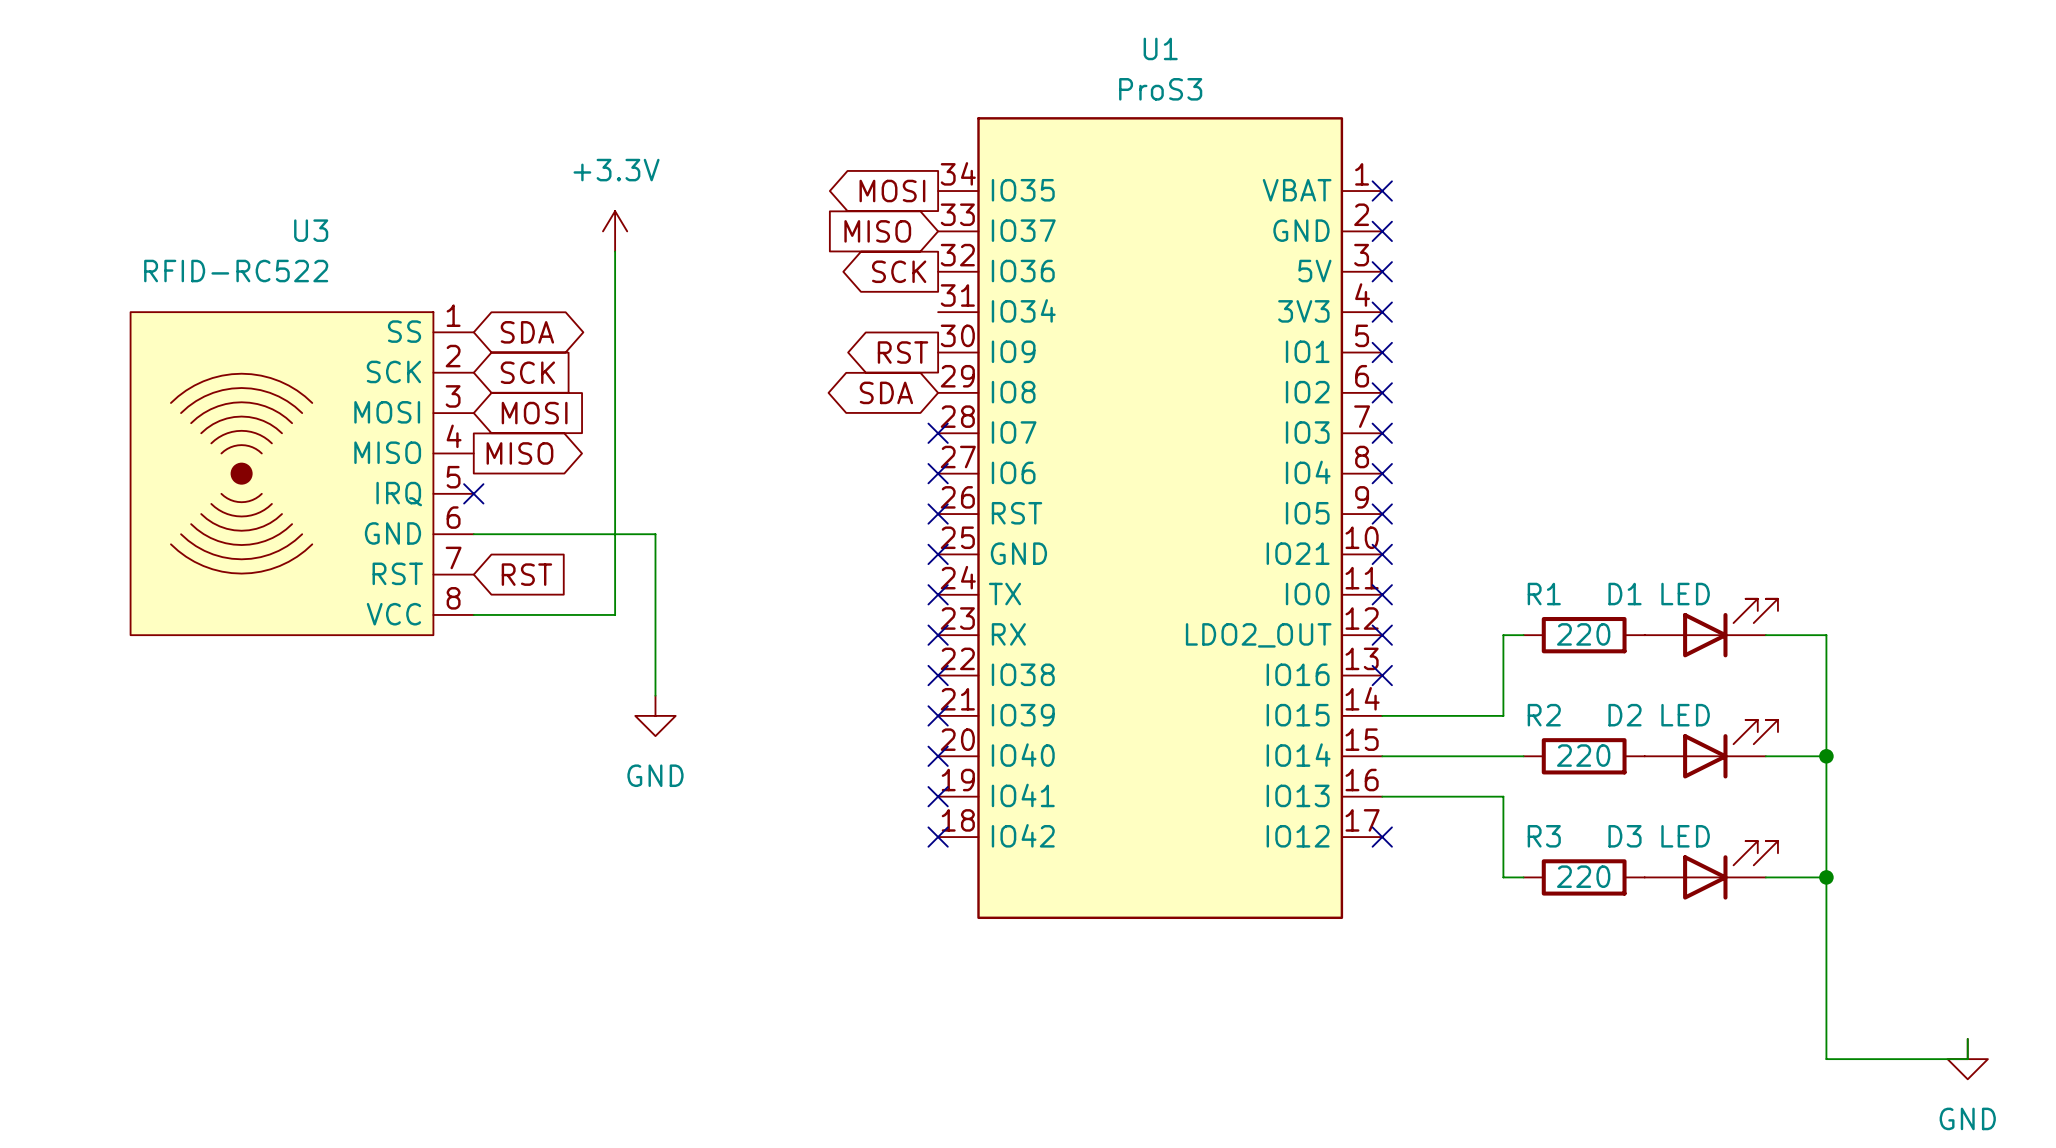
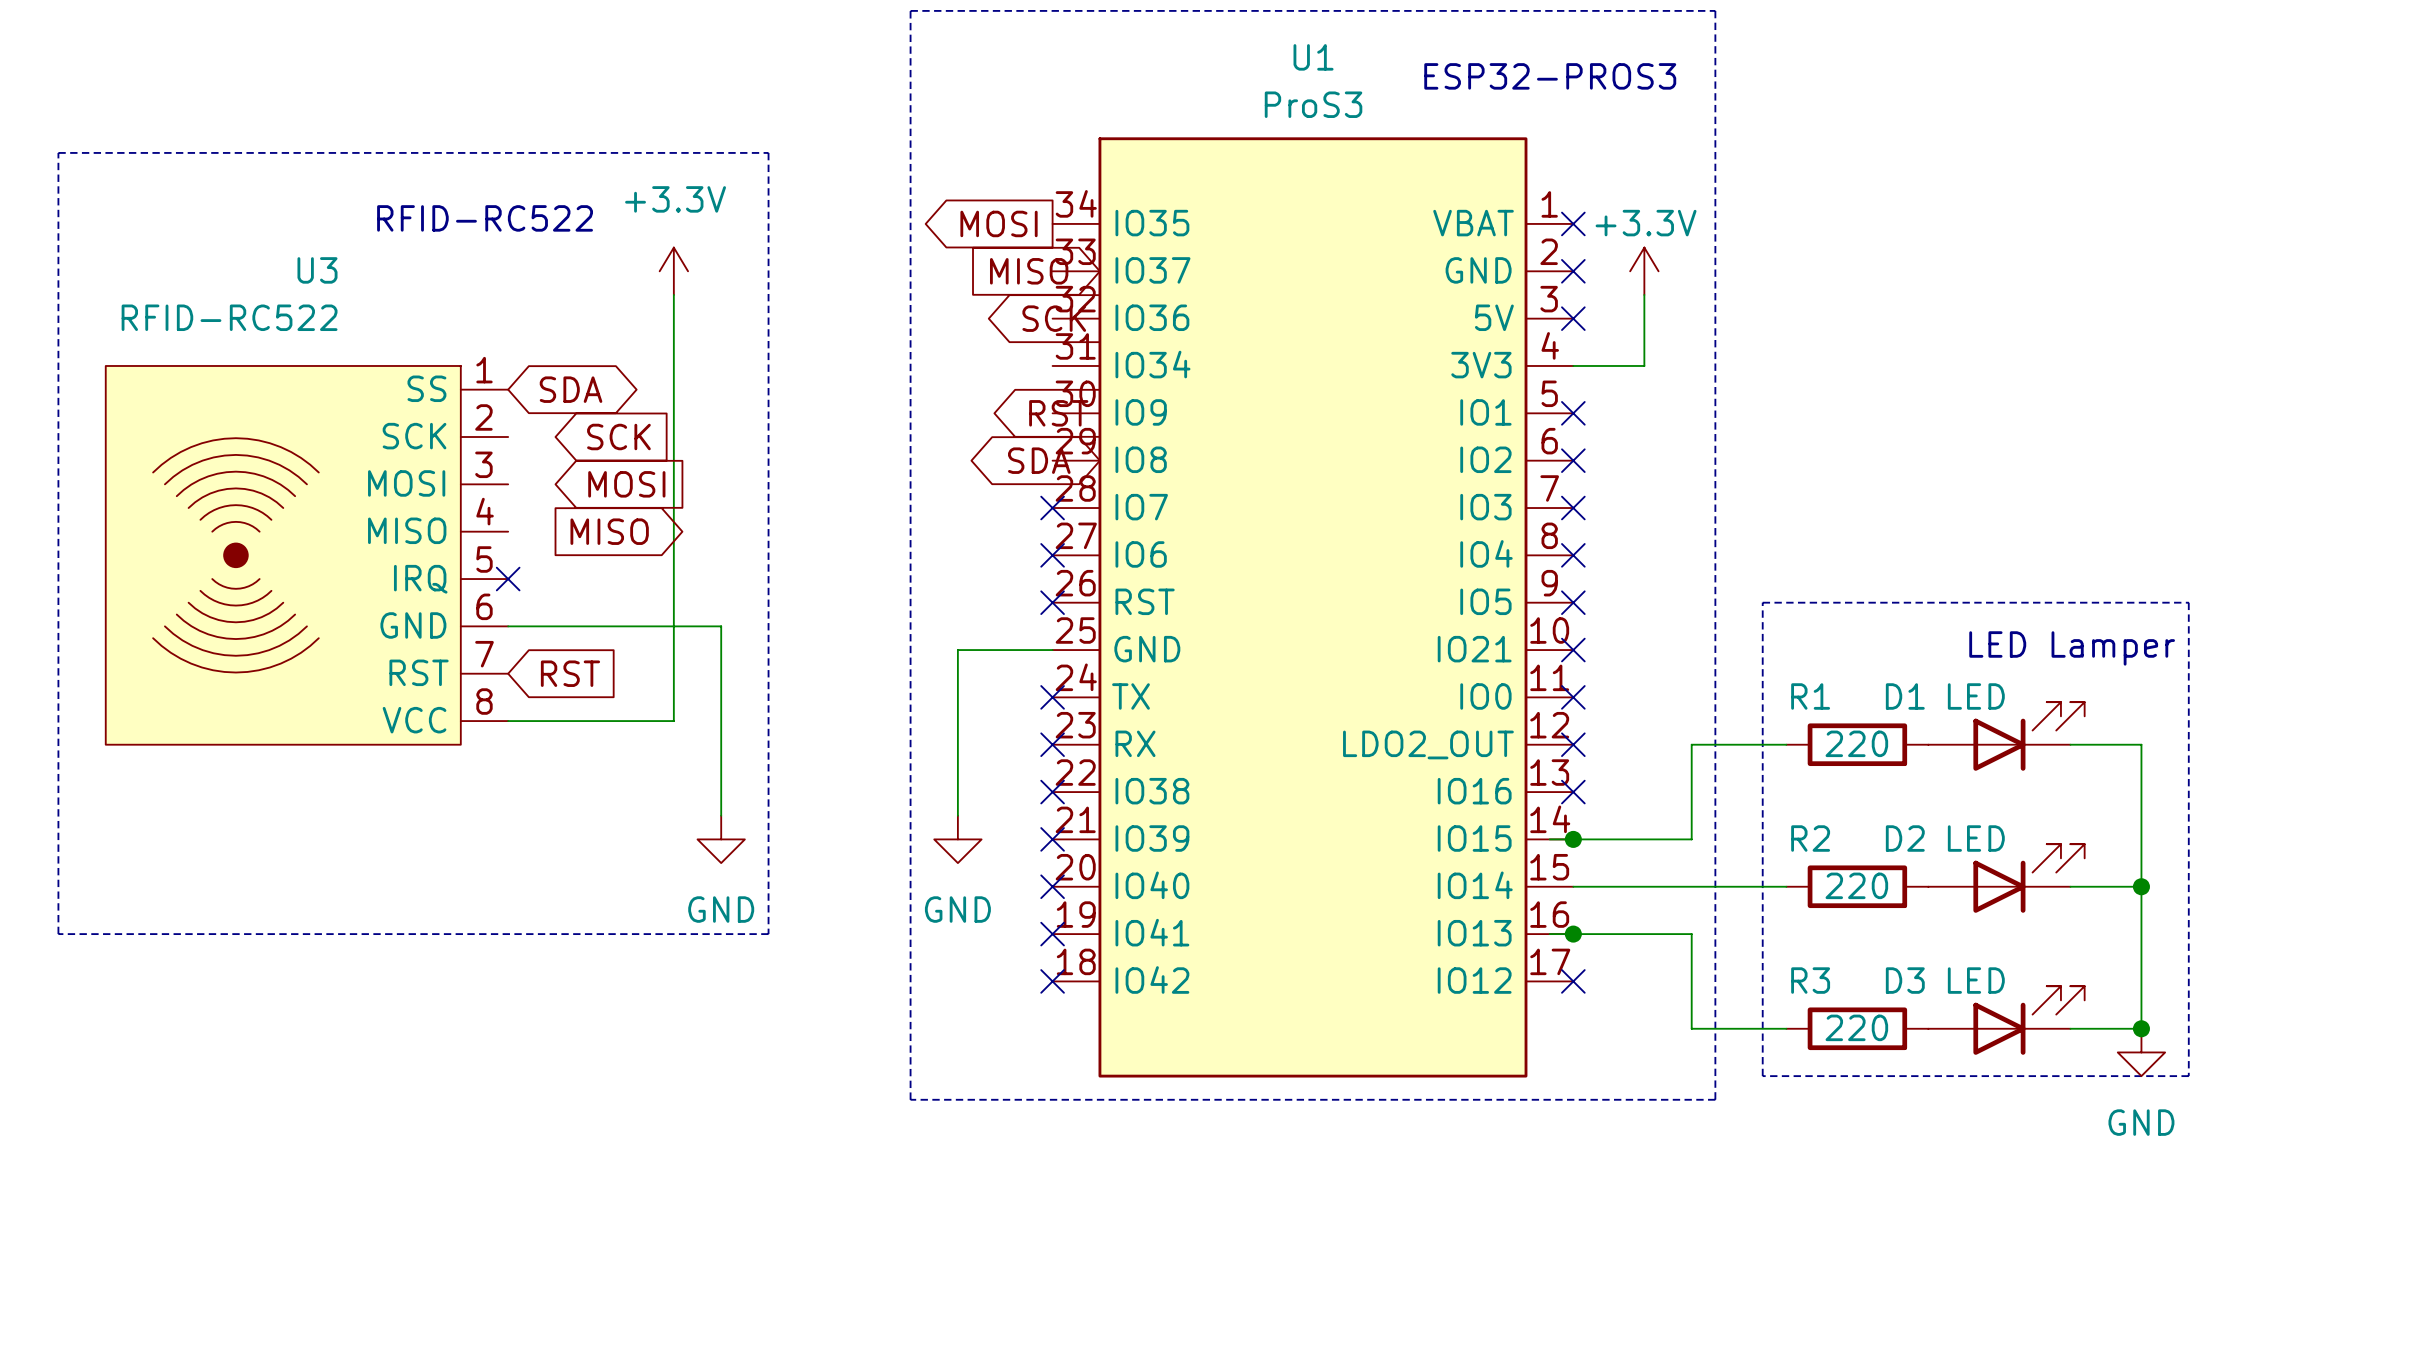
line: none -> (910, 10) (1715, 10) (1715, 1099) (910, 1099) (910, 10)
text: none -> ESP32-PROS3 (1550, 76)
line: none -> (58, 152) (768, 152) (768, 934) (58, 934) (58, 152)
text: none -> RFID-RC522 (485, 218)
global label position: MOSI (892, 191) -> MOSI (999, 223)
no-connect mark: none -> (1573, 223)
no-connect mark: (1382, 191) -> none
power symbol position: +3.3V (615, 231) -> +3.3V (673, 271)
no-connect mark: none -> (1573, 271)
no-connect mark: (1382, 231) -> none
power symbol: none -> +3.3V (1644, 271)
wire: none -> (673, 294) (673, 721)
wire: (615, 251) (615, 534) (655, 534) (655, 695) -> none
wire: none -> (1644, 294) (1644, 365) (1573, 365)
no-connect mark: none -> (1573, 318)
no-connect mark: (1382, 271) -> none
no-connect mark: (1382, 312) -> none
global label position: SDA (527, 332) -> SDA (571, 389)
no-connect mark: none -> (1573, 413)
no-connect mark: (1382, 352) -> none
no-connect mark: none -> (1573, 460)
no-connect mark: (1382, 392) -> none
no-connect mark: none -> (1052, 508)
no-connect mark: (938, 433) -> none
no-connect mark: none -> (1573, 508)
no-connect mark: (1382, 433) -> none
U3 position: (302, 473) -> (306, 555)
no-connect mark: none -> (1052, 555)
no-connect mark: (938, 473) -> none
no-connect mark: none -> (1573, 555)
no-connect mark: (1382, 473) -> none
no-connect mark position: (473, 493) -> (508, 579)
no-connect mark: none -> (1052, 602)
no-connect mark: (938, 514) -> none
no-connect mark: none -> (1573, 602)
no-connect mark: (1382, 514) -> none
line: none -> (1762, 602) (2188, 602) (2188, 1076) (1762, 1076) (1762, 602)
U1 position: (1160, 518) -> (1312, 607)
text: none -> LED Lamper (2072, 648)
wire: none -> (1052, 650) (957, 650) (957, 815)
no-connect mark: (938, 554) -> none
no-connect mark: none -> (1573, 650)
no-connect mark: (1382, 554) -> none
global label position: RST (526, 574) -> RST (570, 673)
no-connect mark: none -> (1052, 697)
no-connect mark: (938, 594) -> none
no-connect mark: none -> (1573, 697)
no-connect mark: (1382, 594) -> none
wire: (574, 614) (615, 614) -> (721, 815) (721, 721)
no-connect mark: none -> (1052, 744)
no-connect mark: (938, 635) -> none
no-connect mark: none -> (1573, 744)
no-connect mark: (1382, 635) -> none
wire: (1503, 635) (1503, 715) (1442, 715) -> (1762, 744) (1691, 744) (1691, 839)
no-connect mark: none -> (1052, 792)
no-connect mark: (938, 675) -> none
no-connect mark: none -> (1573, 792)
no-connect mark: (1382, 675) -> none
power symbol position: GND (655, 715) -> GND (721, 839)
power symbol: none -> GND (957, 839)
no-connect mark: none -> (1052, 839)
no-connect mark: (938, 715) -> none
junction: none -> (1573, 839)
no-connect mark: none -> (1052, 886)
no-connect mark: (938, 756) -> none
no-connect mark: none -> (1052, 934)
no-connect mark: (938, 796) -> none
junction: none -> (1573, 934)
wire: (1442, 796) (1503, 796) (1503, 877) -> (1691, 934) (1691, 1028) (1762, 1028)
no-connect mark: none -> (1052, 981)
no-connect mark: (938, 837) -> none
no-connect mark position: (1382, 837) -> (1573, 981)
wire: (1826, 877) (1826, 1059) (1967, 1059) (1967, 1038) -> none
power symbol position: GND (1967, 1059) -> GND (2141, 1052)

